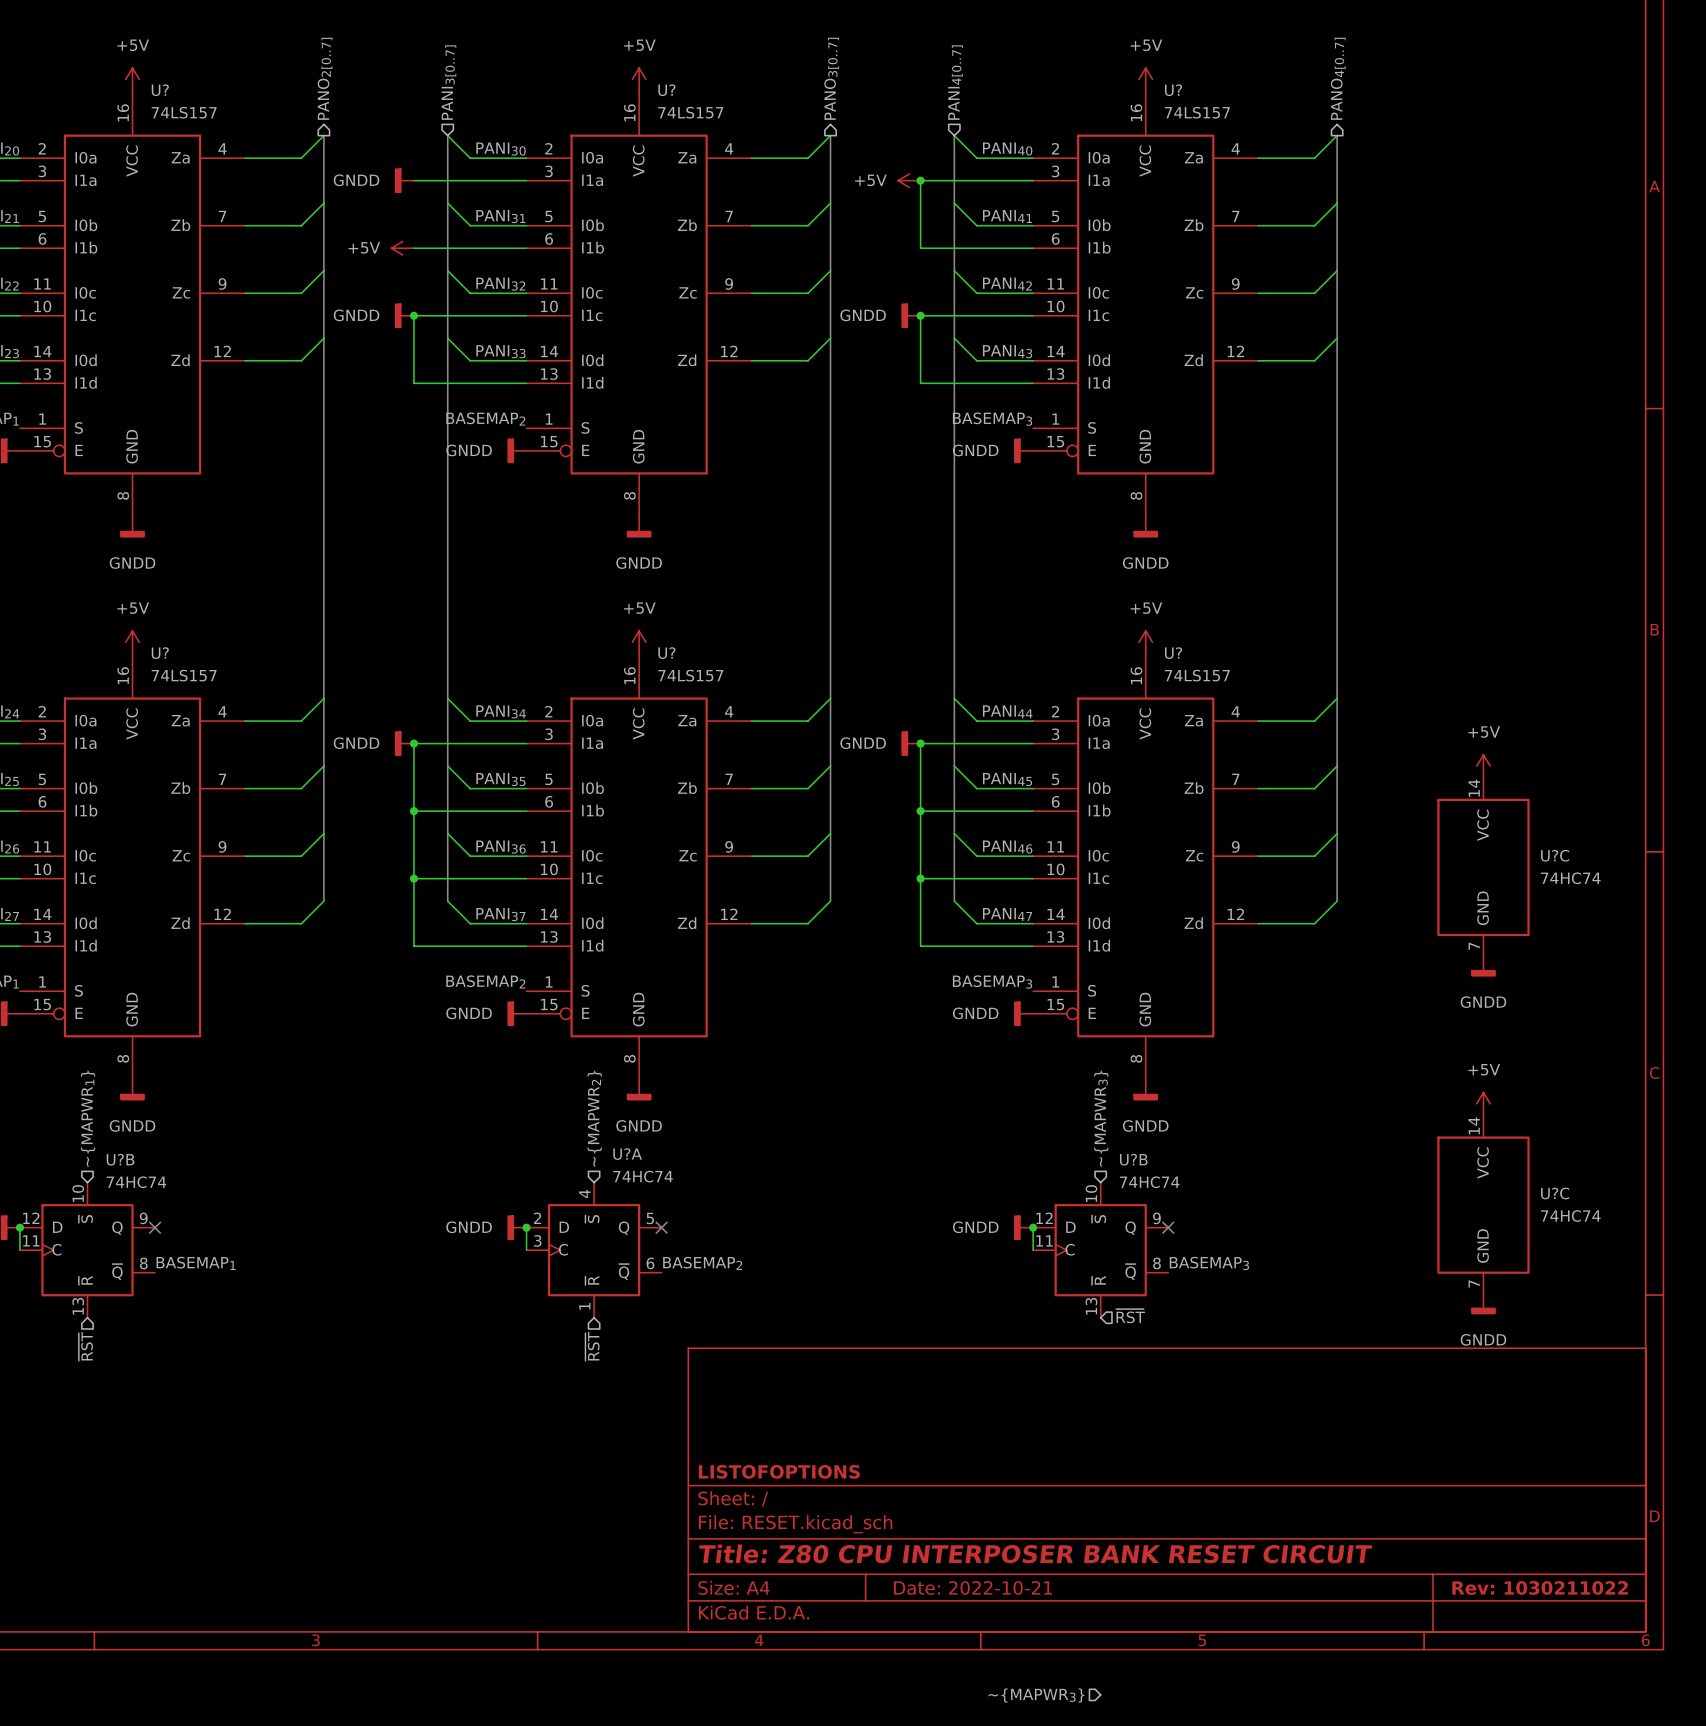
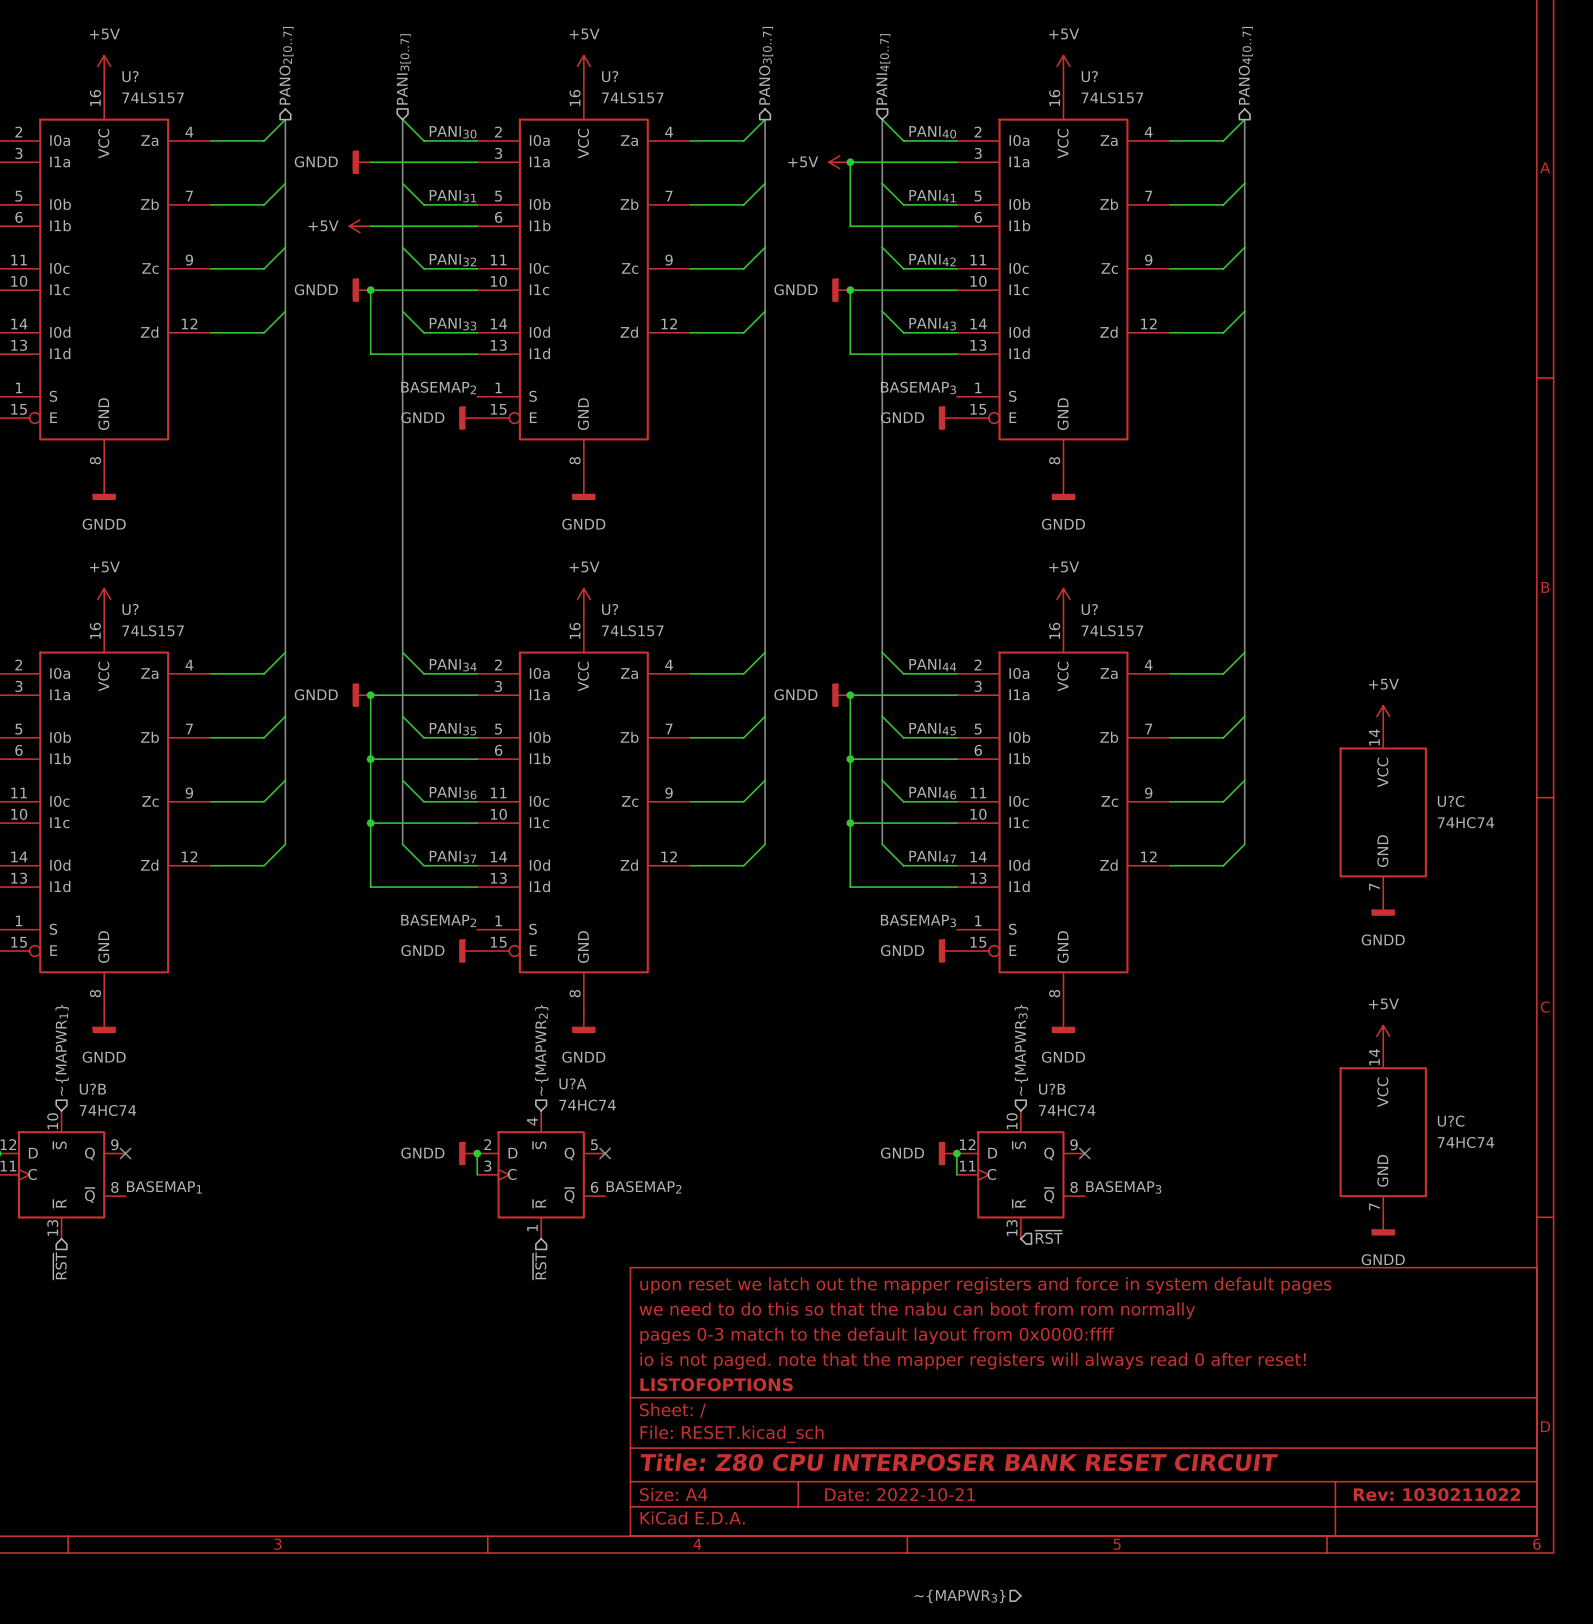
title block: none -> upon reset we latch out the mapper registers and force in system default pages (985, 1285)
title block: none -> we need to do this so that the nabu can boot from rom normally (917, 1310)
title block: none -> pages 0-3 match to the default layout from 0x0000:ffff (877, 1335)
title block: none -> io is not paged. note that the mapper registers will always read 0 after reset! (973, 1361)

